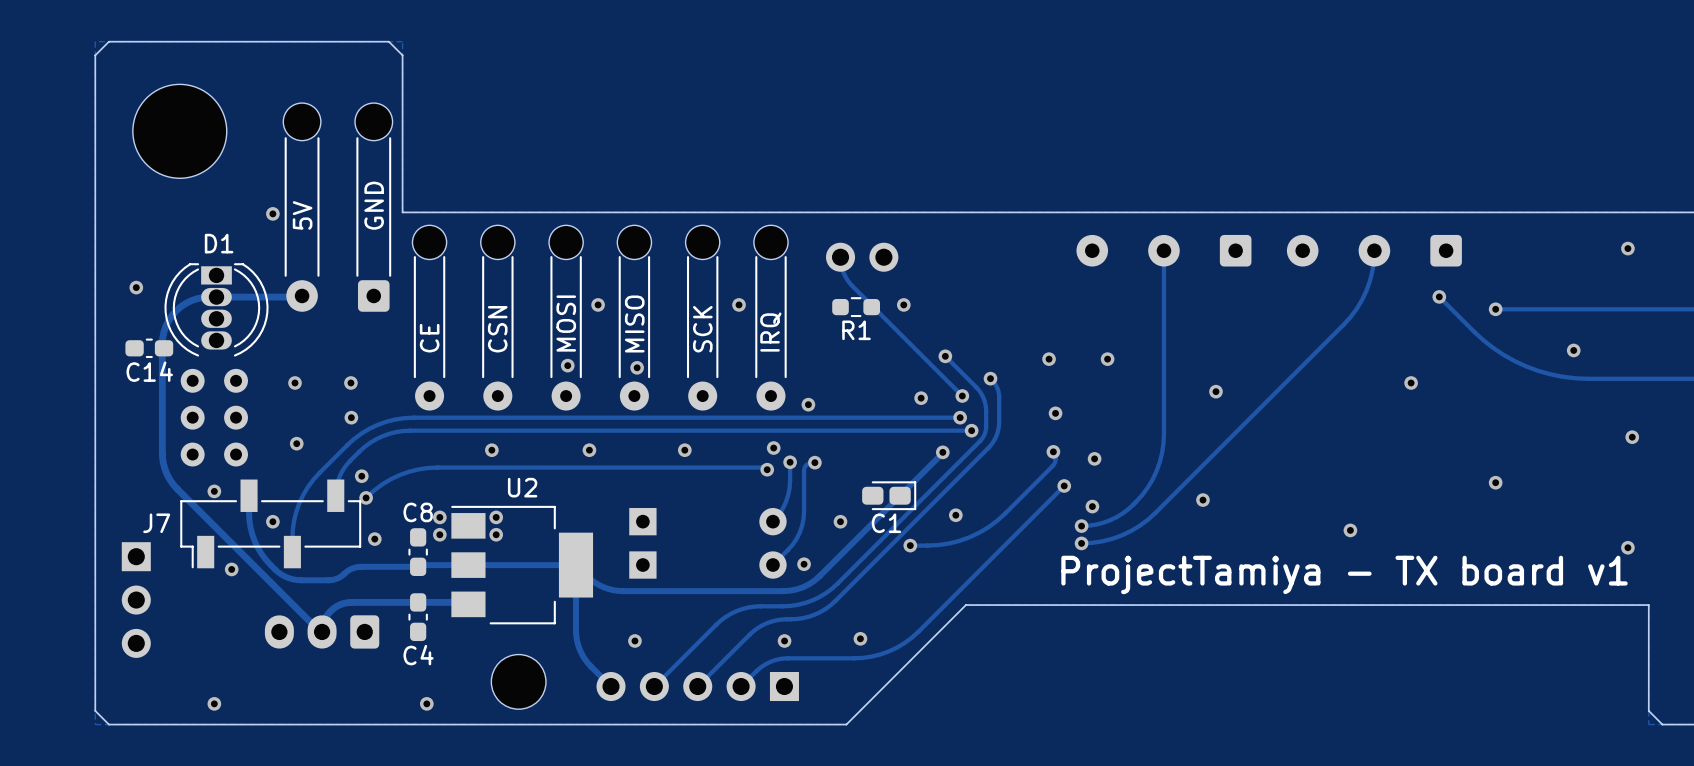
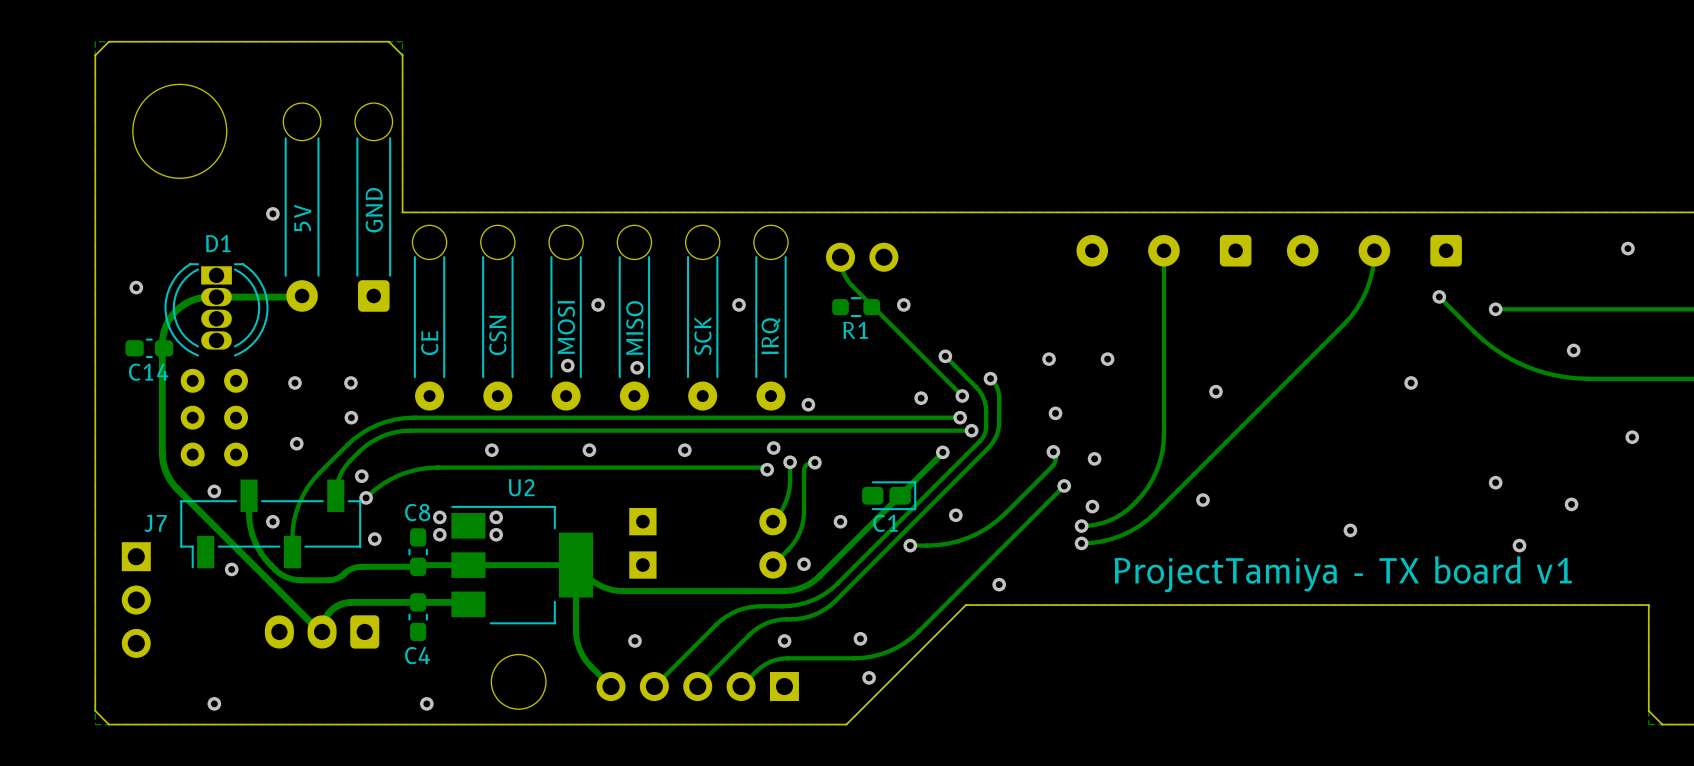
via: none -> (1571, 504)
via: none -> (1519, 545)
via: (1627, 547) -> none
via: none -> (999, 584)
via: none -> (869, 677)

